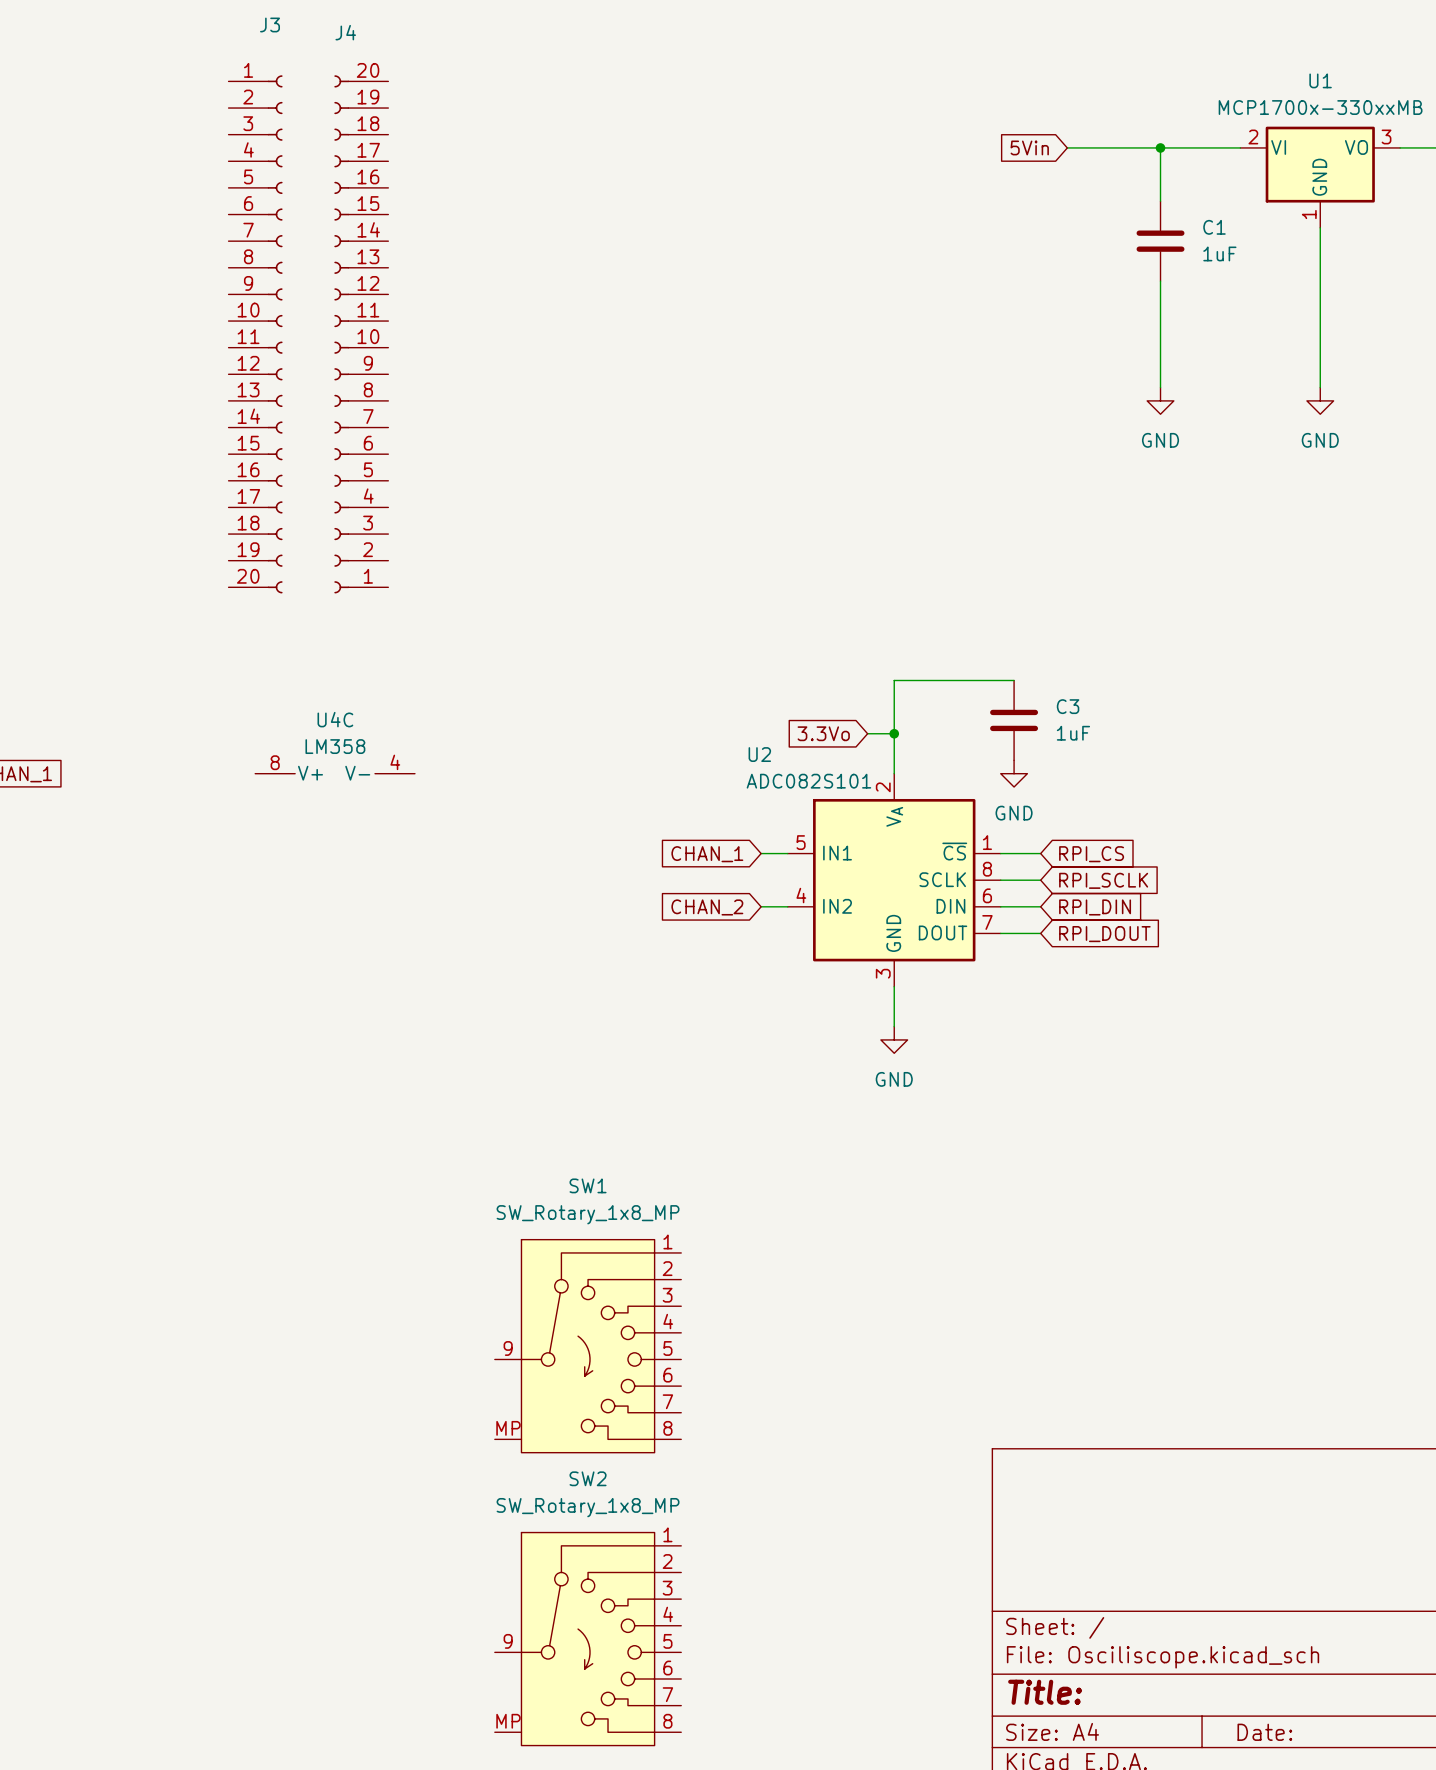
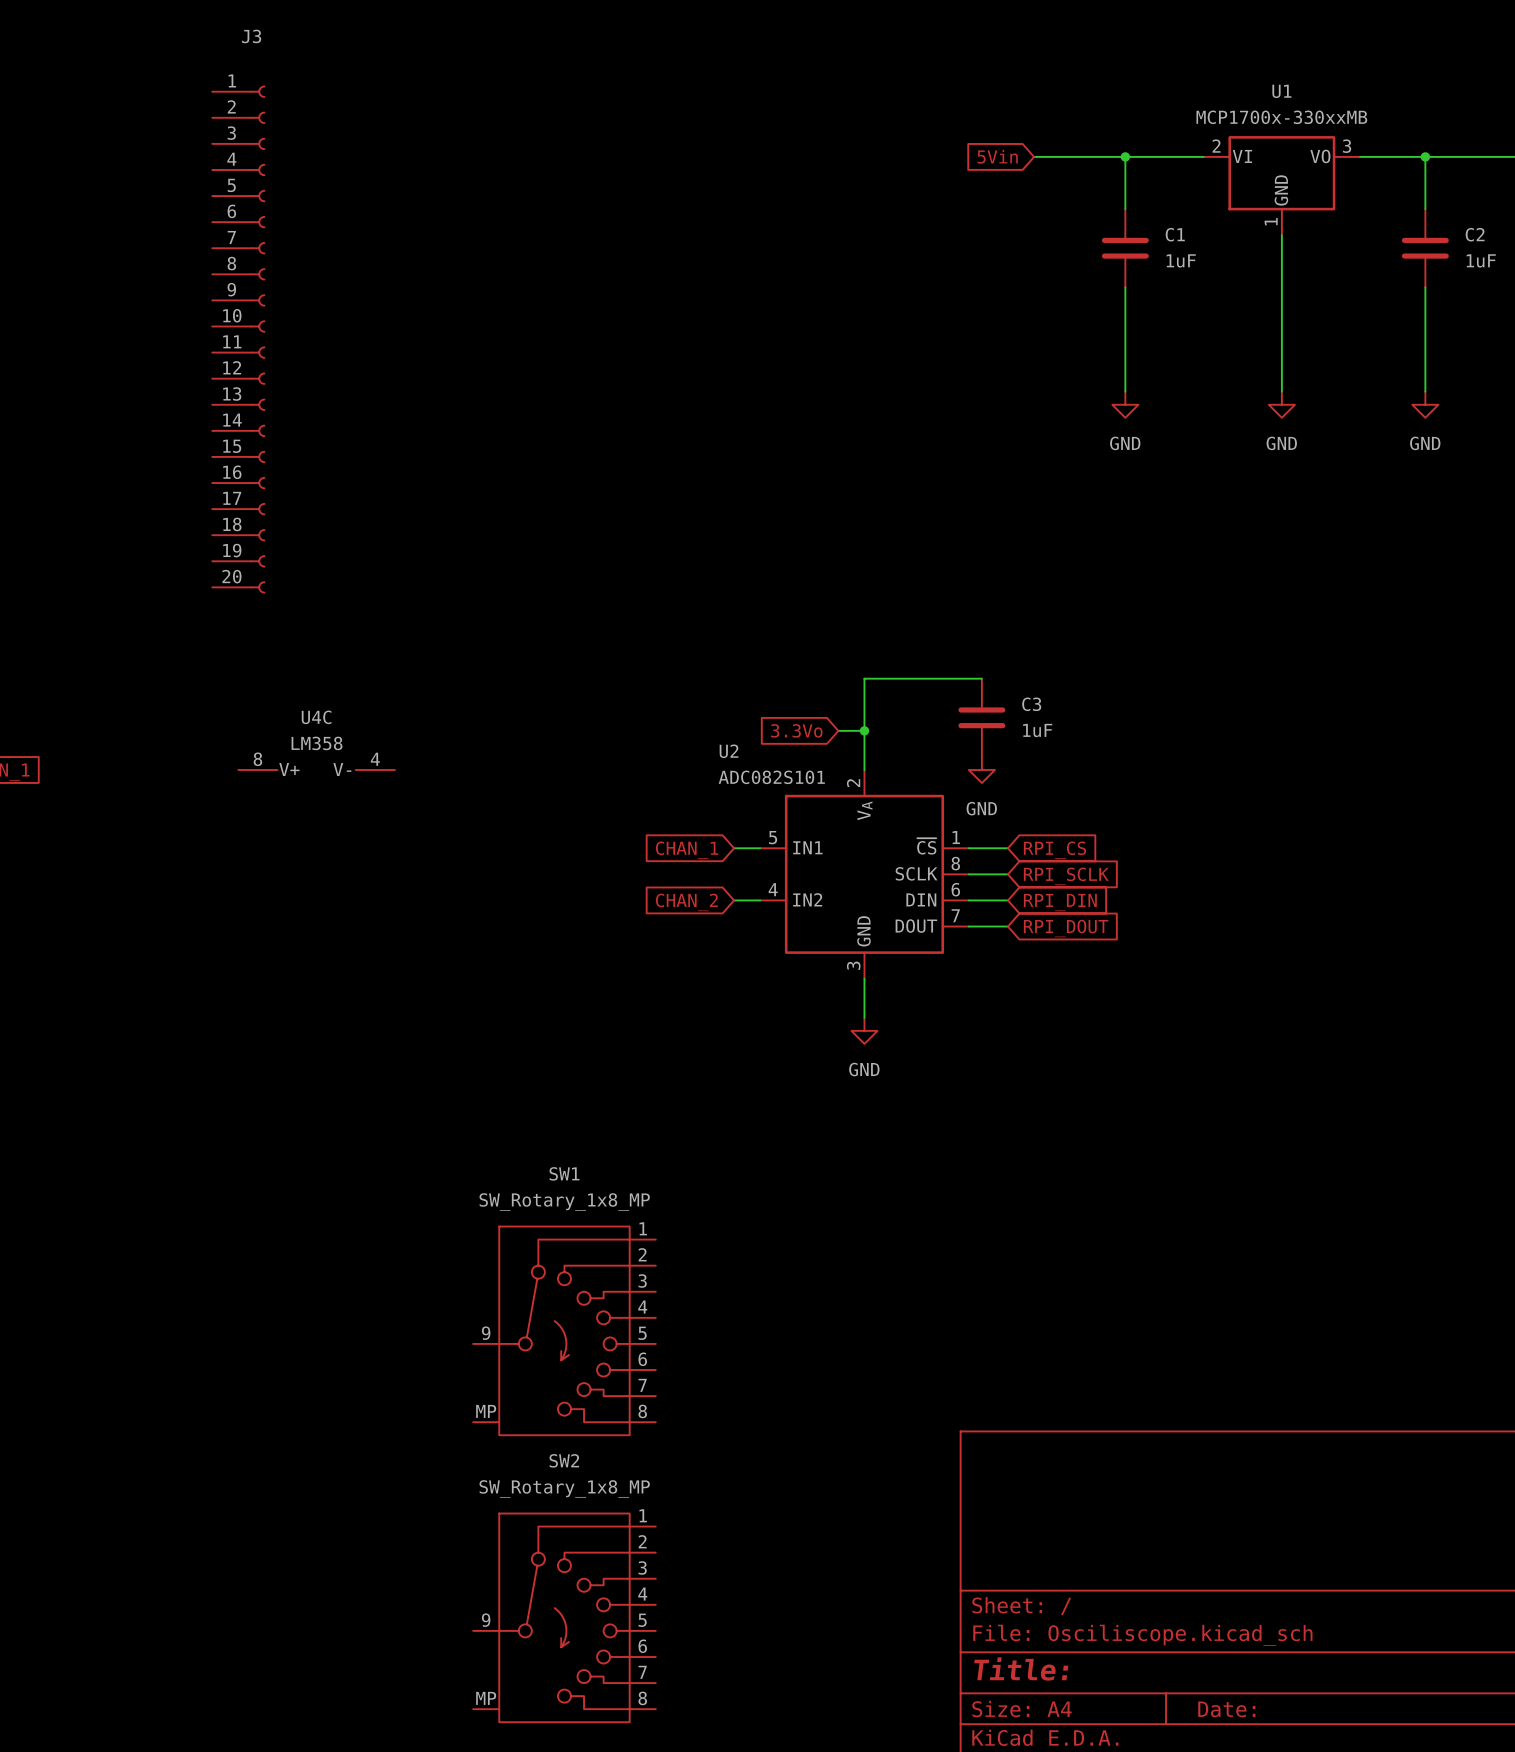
J4: (361, 334) -> none

